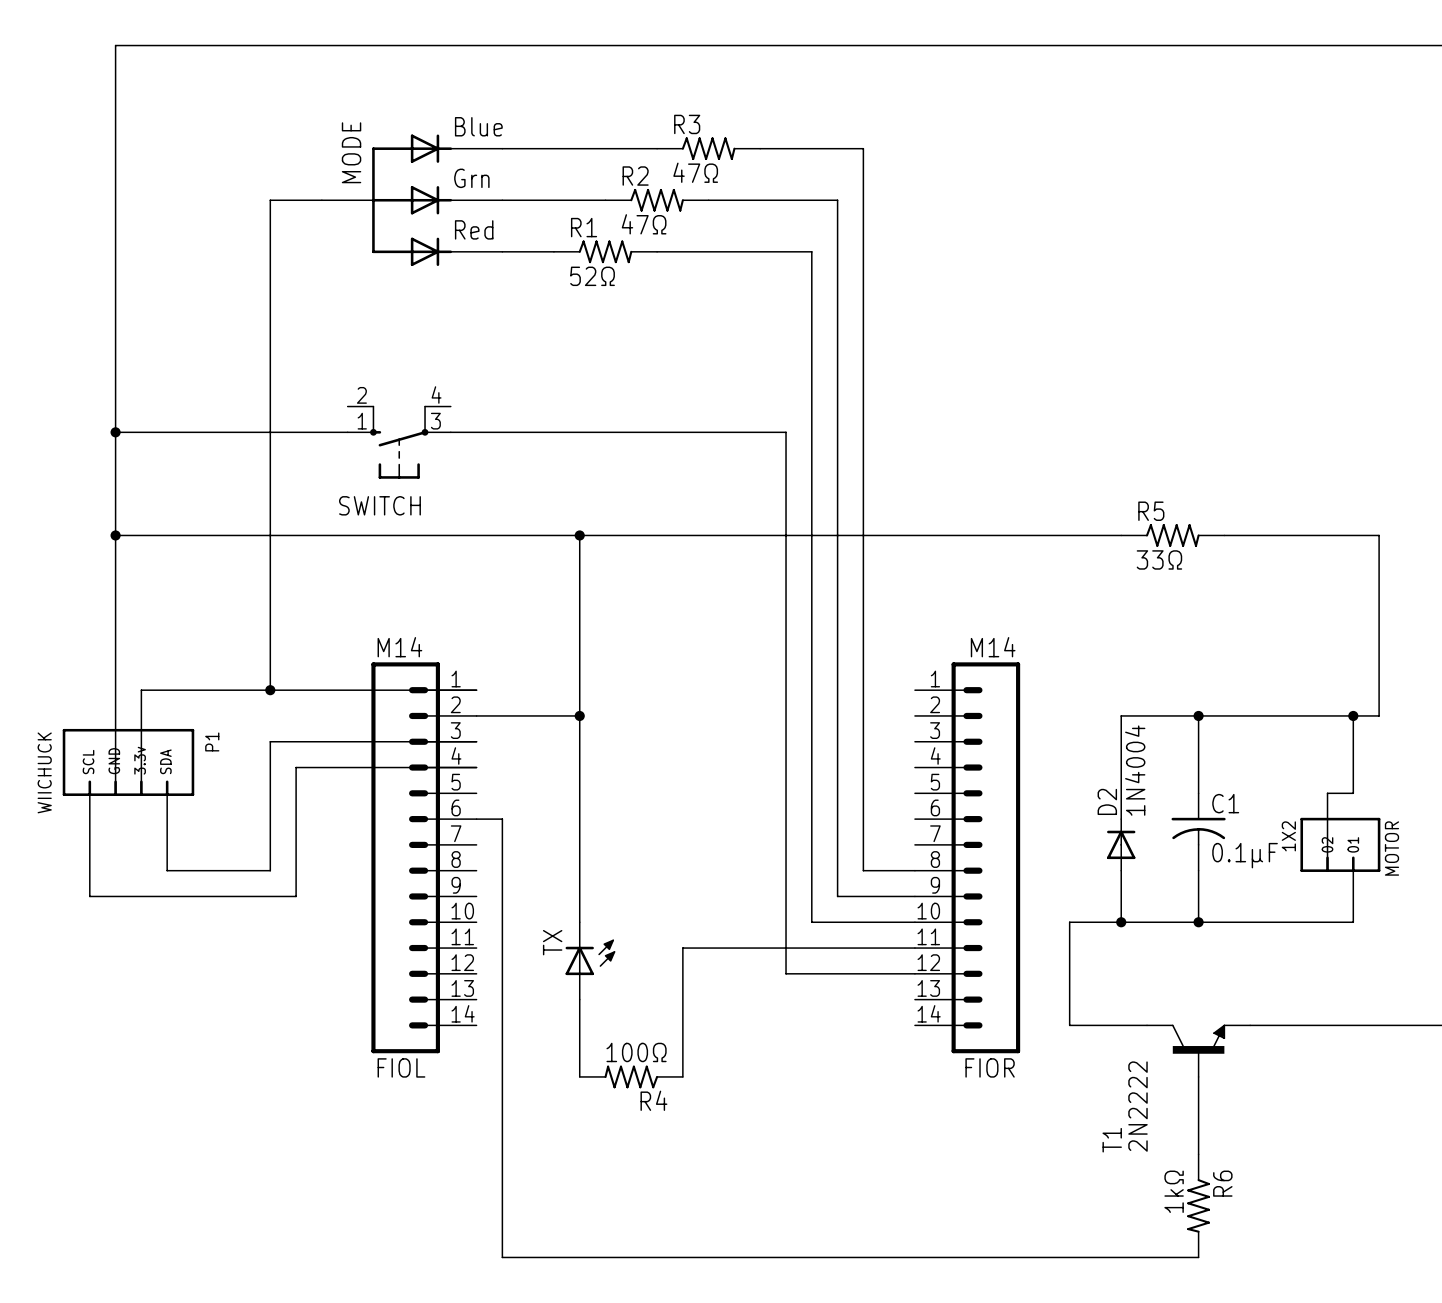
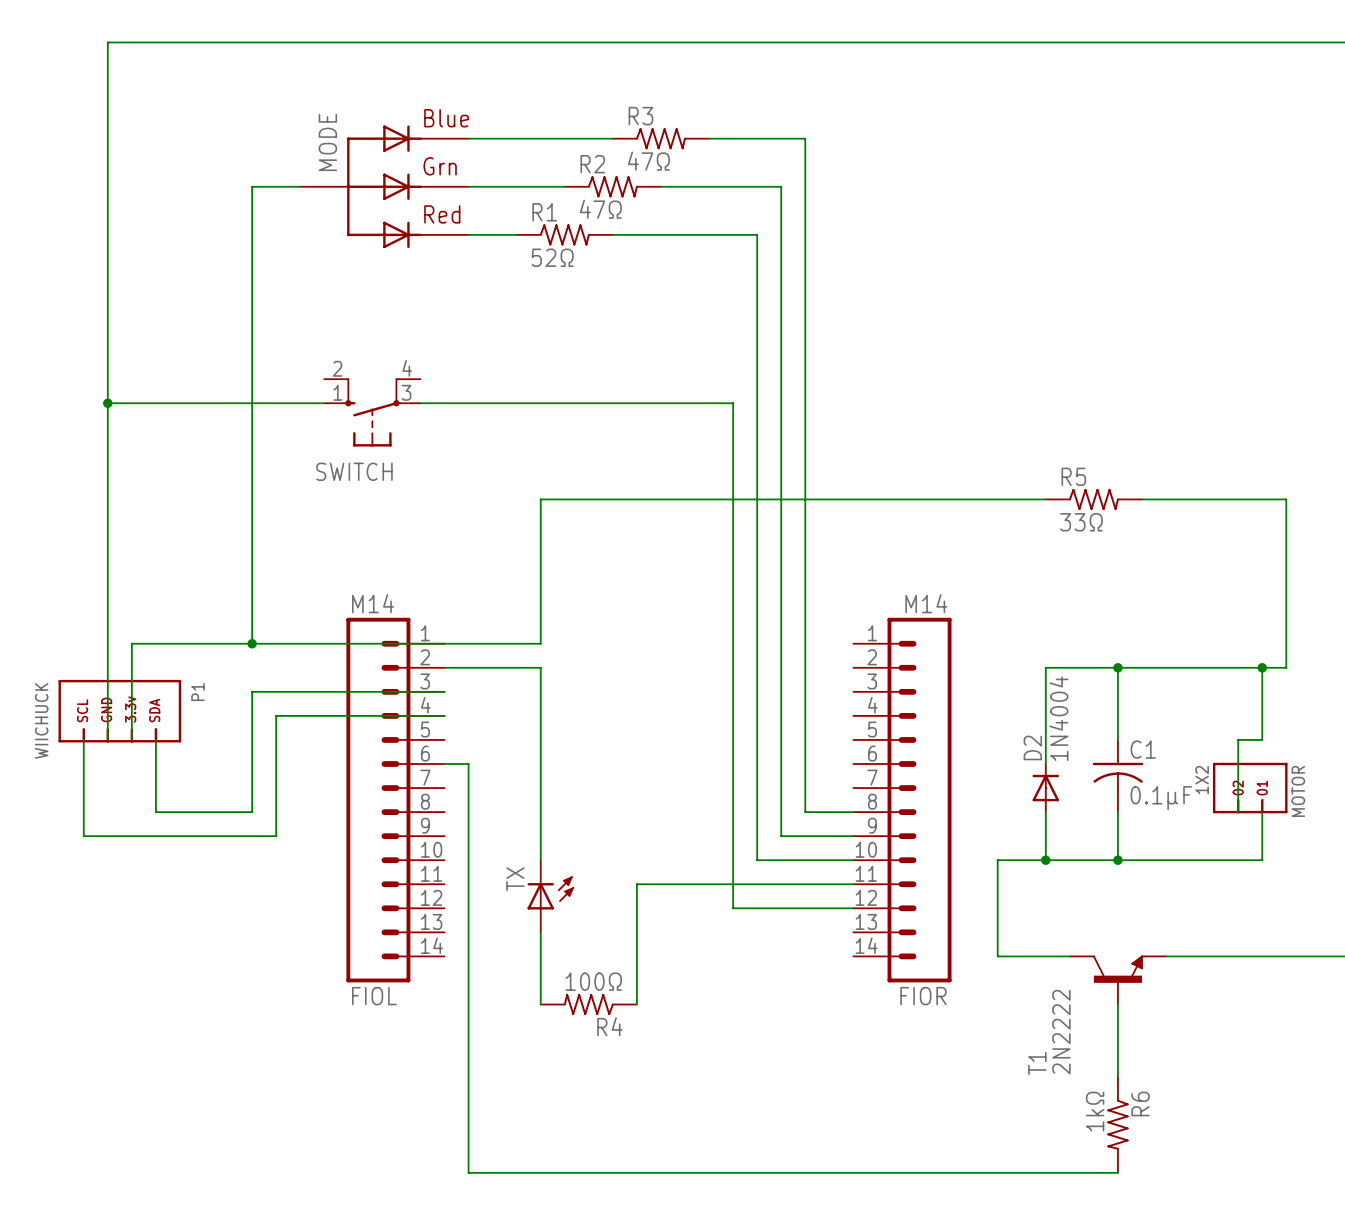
wire: (115, 535) (579, 535) -> none
junction: (115, 535) -> none
junction: (579, 535) -> none
wire: (579, 690) (579, 715) -> (540, 643) (444, 643)
junction: (579, 715) -> none

